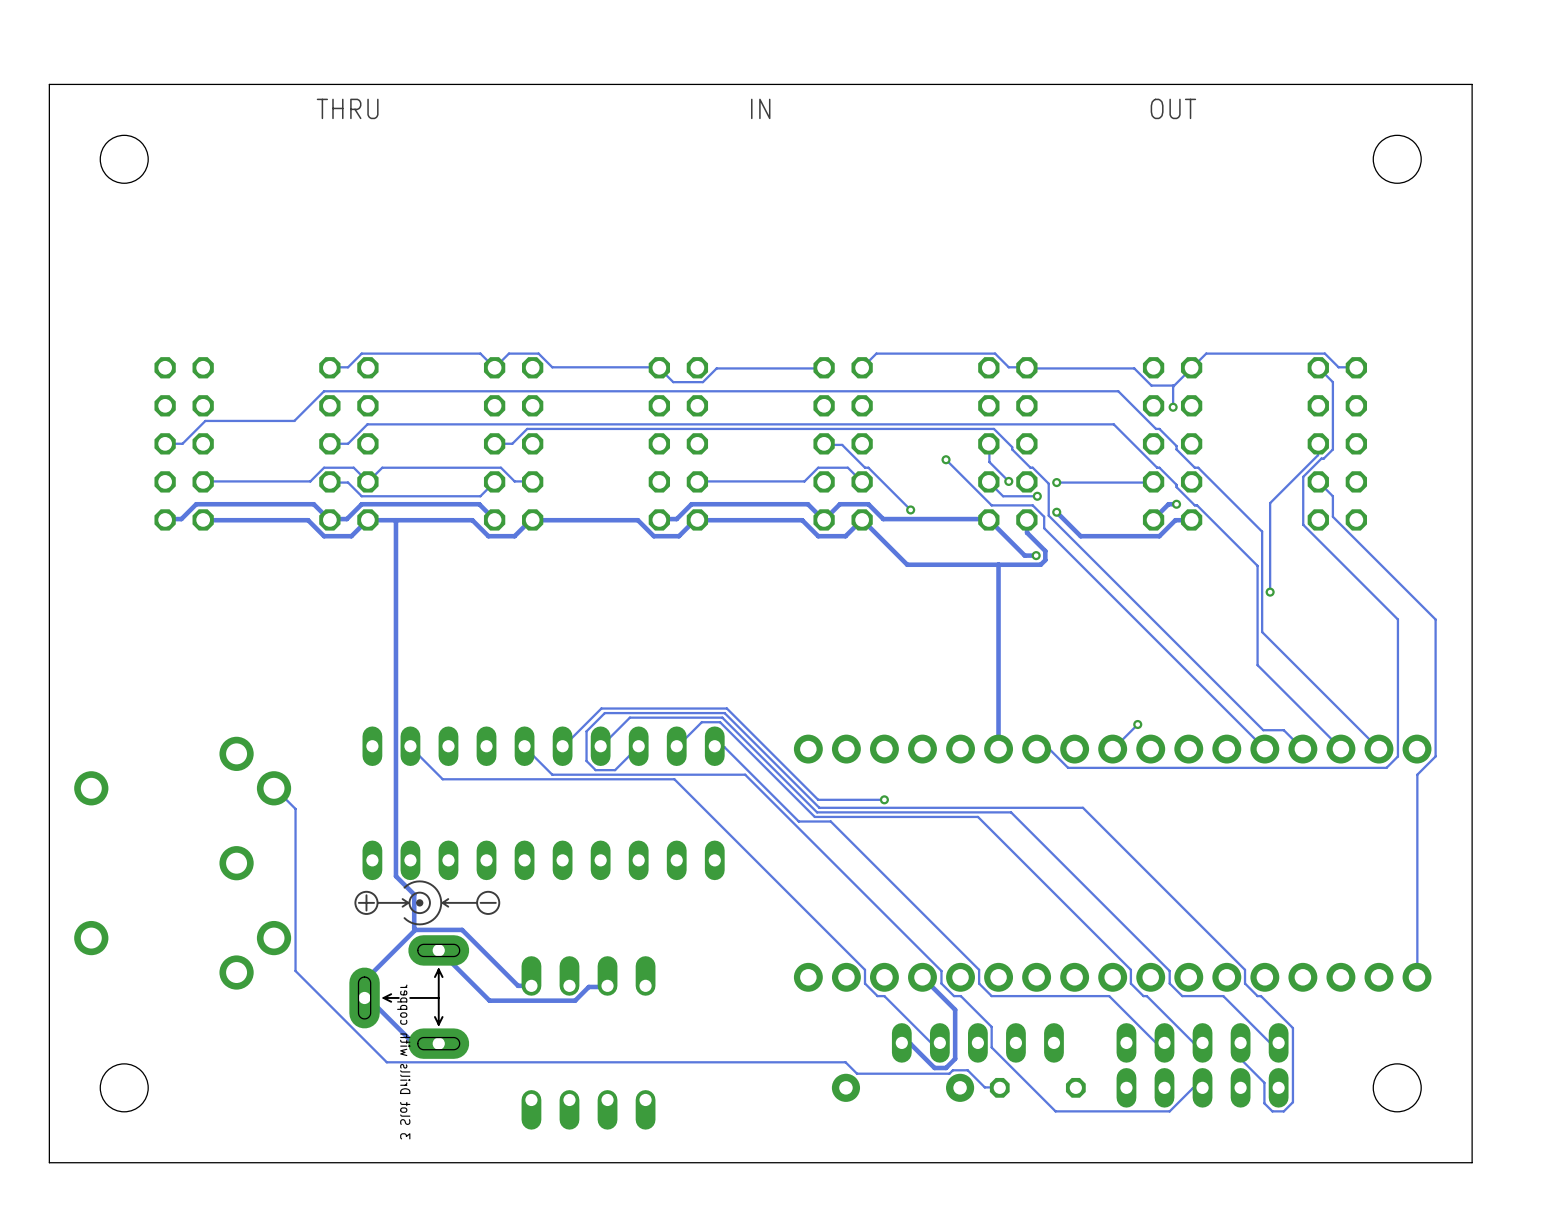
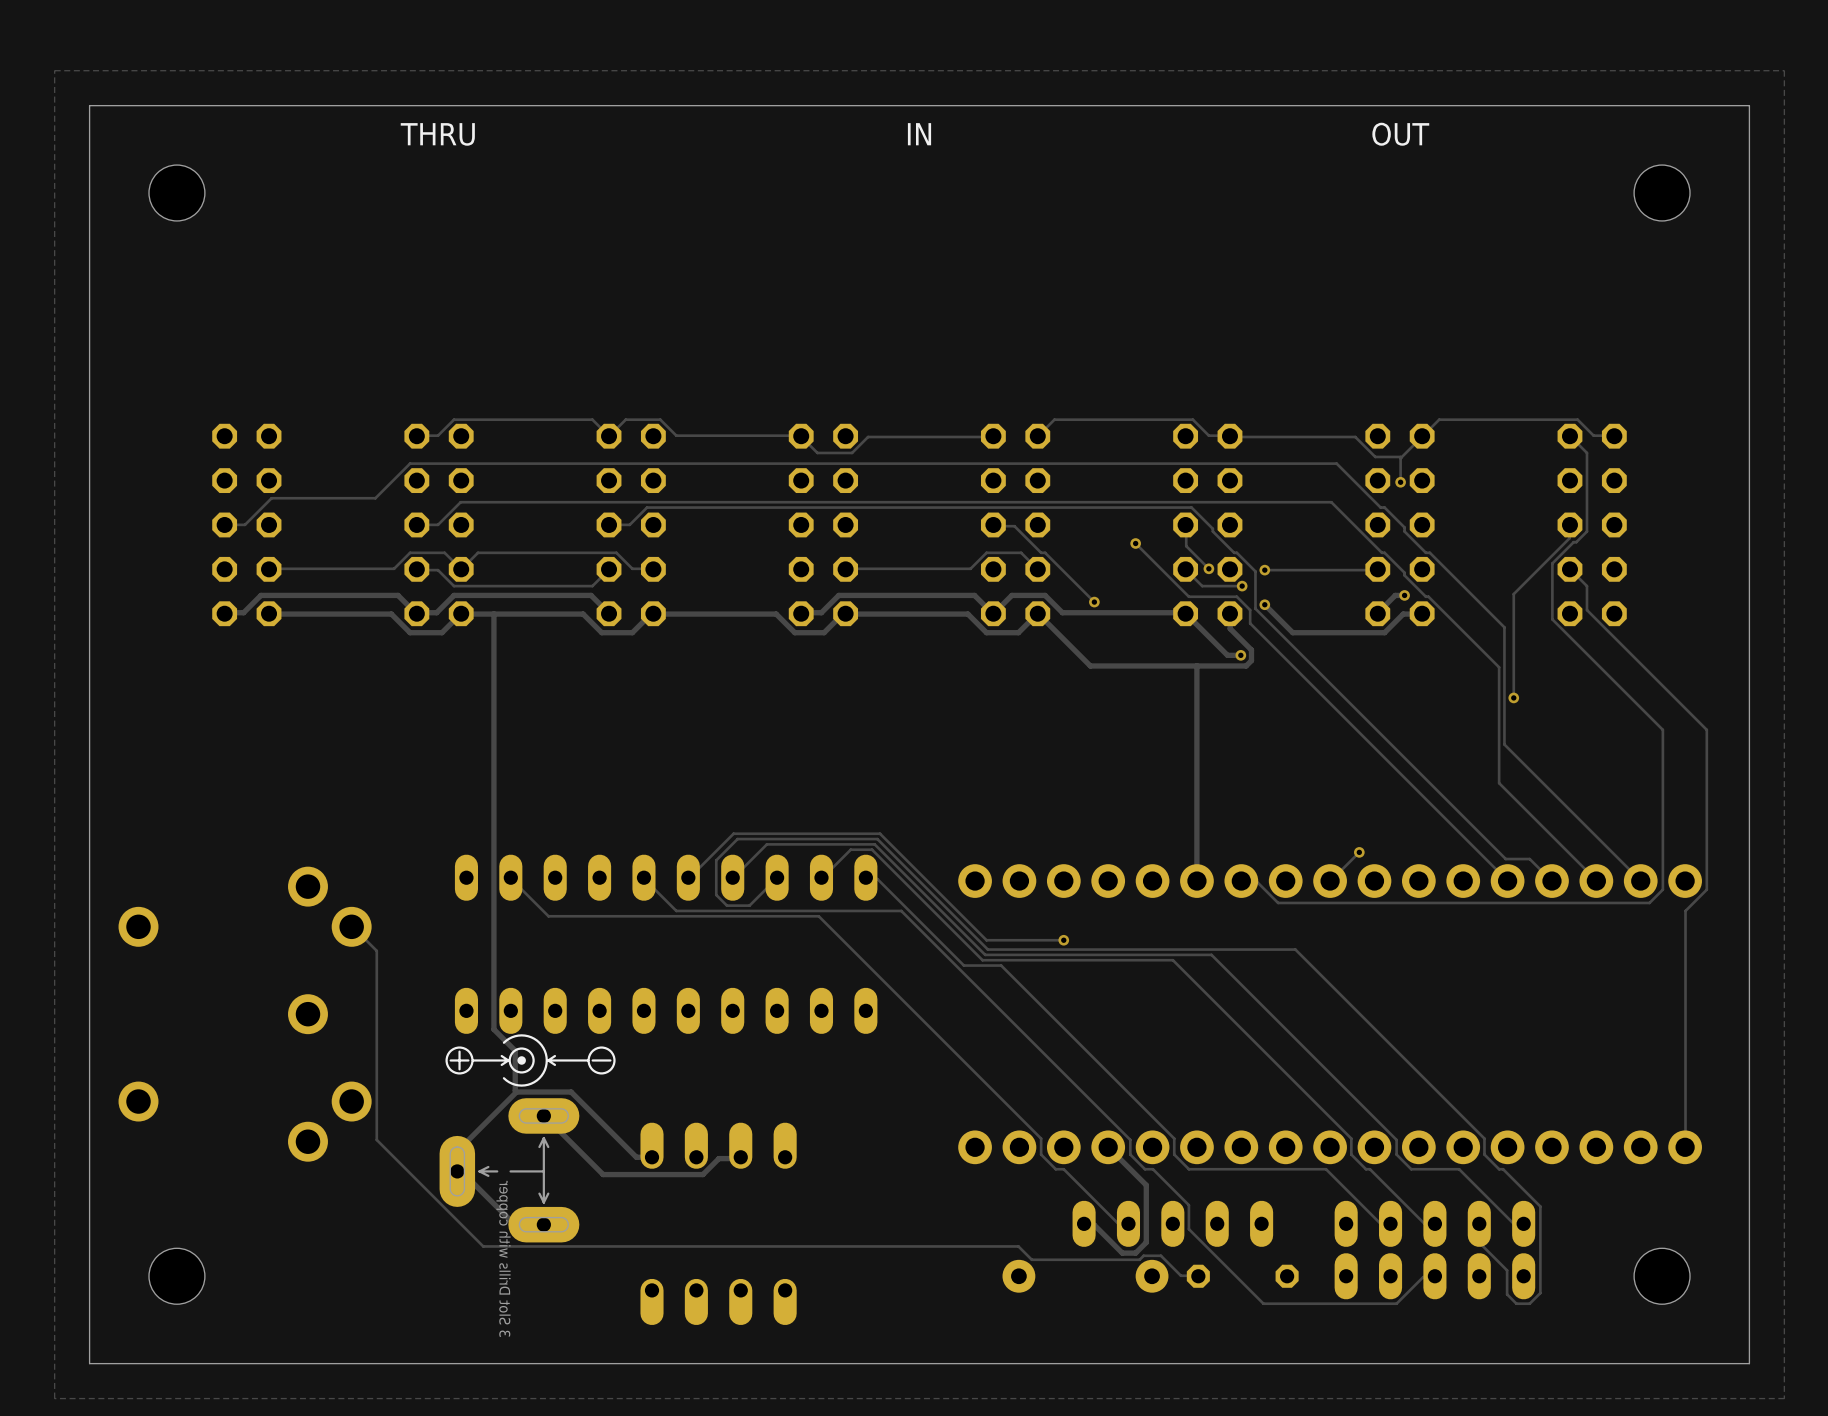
zone outline: none -> (1784, 70) (54, 70) (54, 1398) (1784, 1398) (1784, 70)

